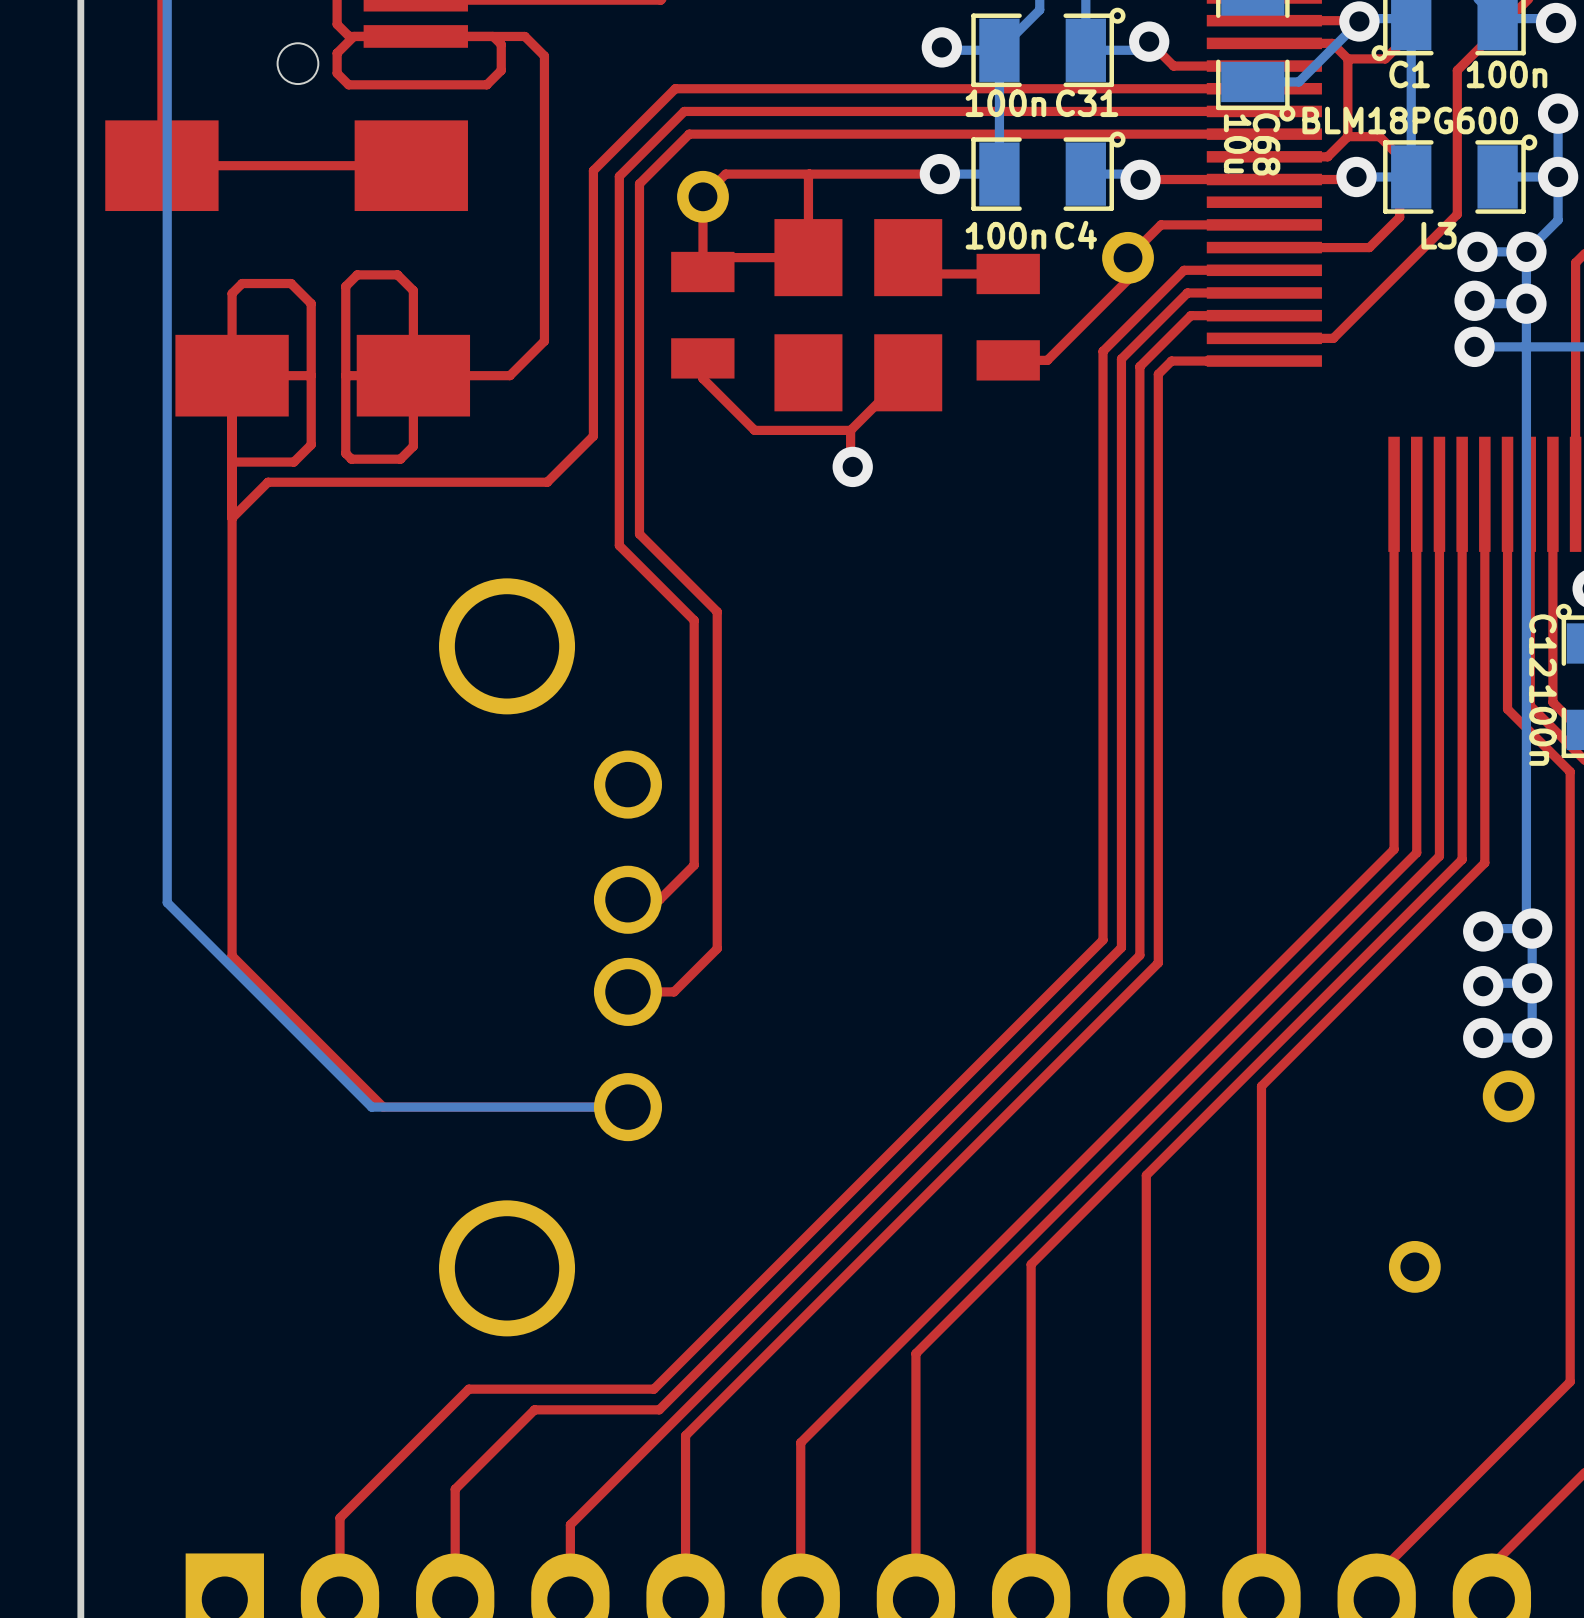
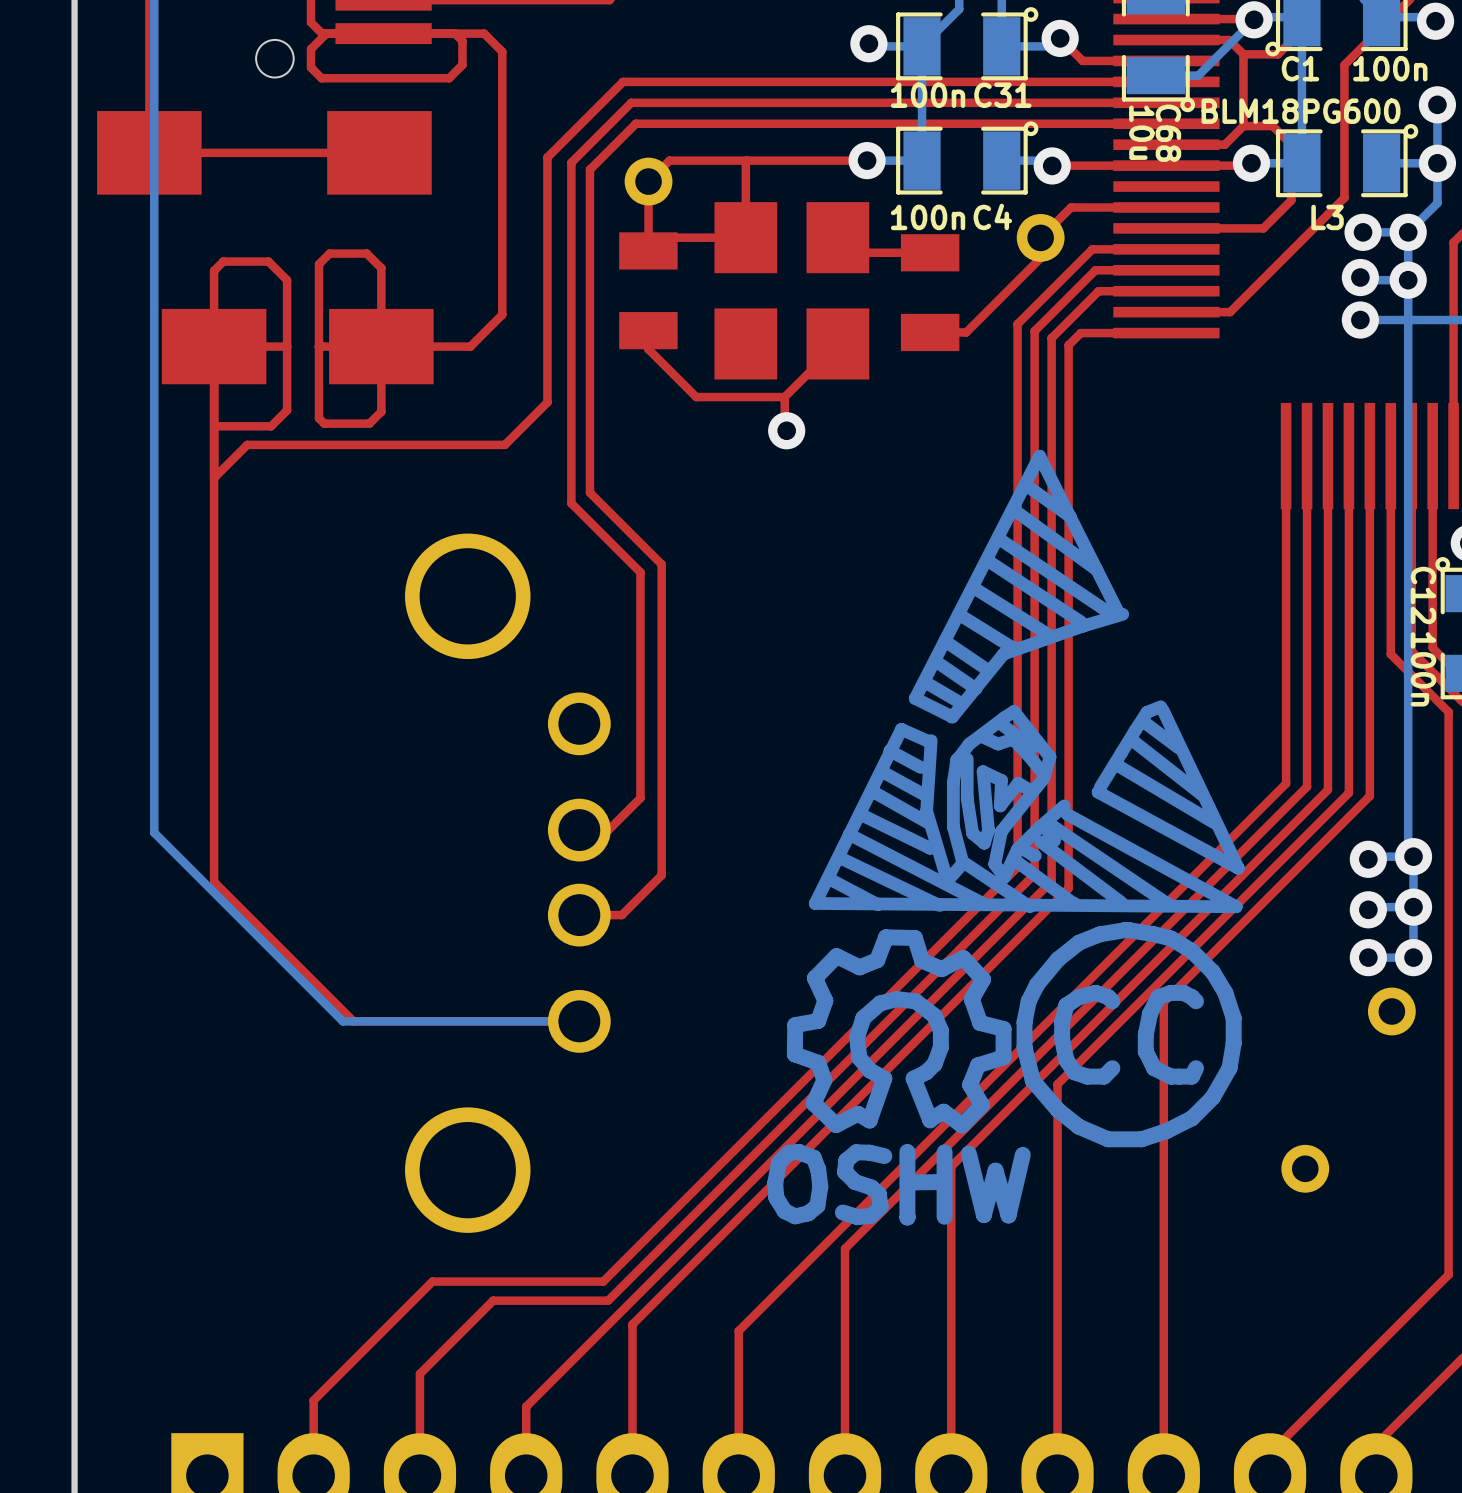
drawing: none -> [767, 449, 1245, 1226]

